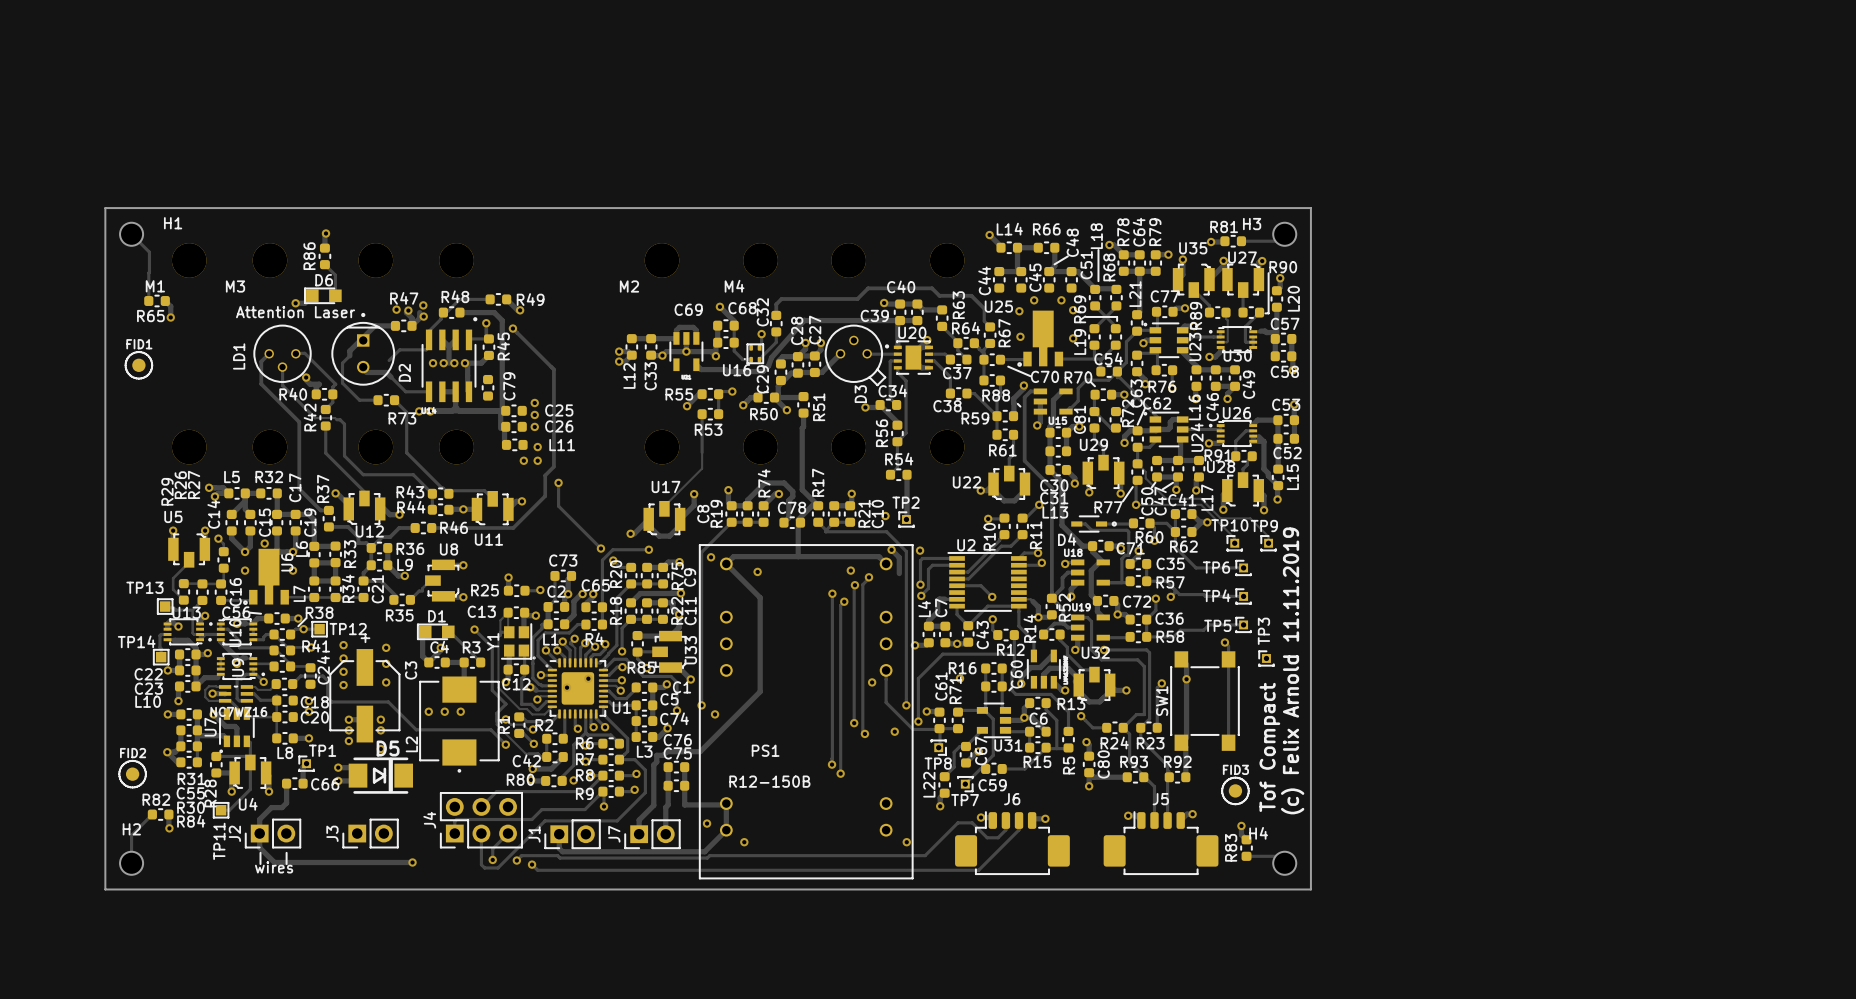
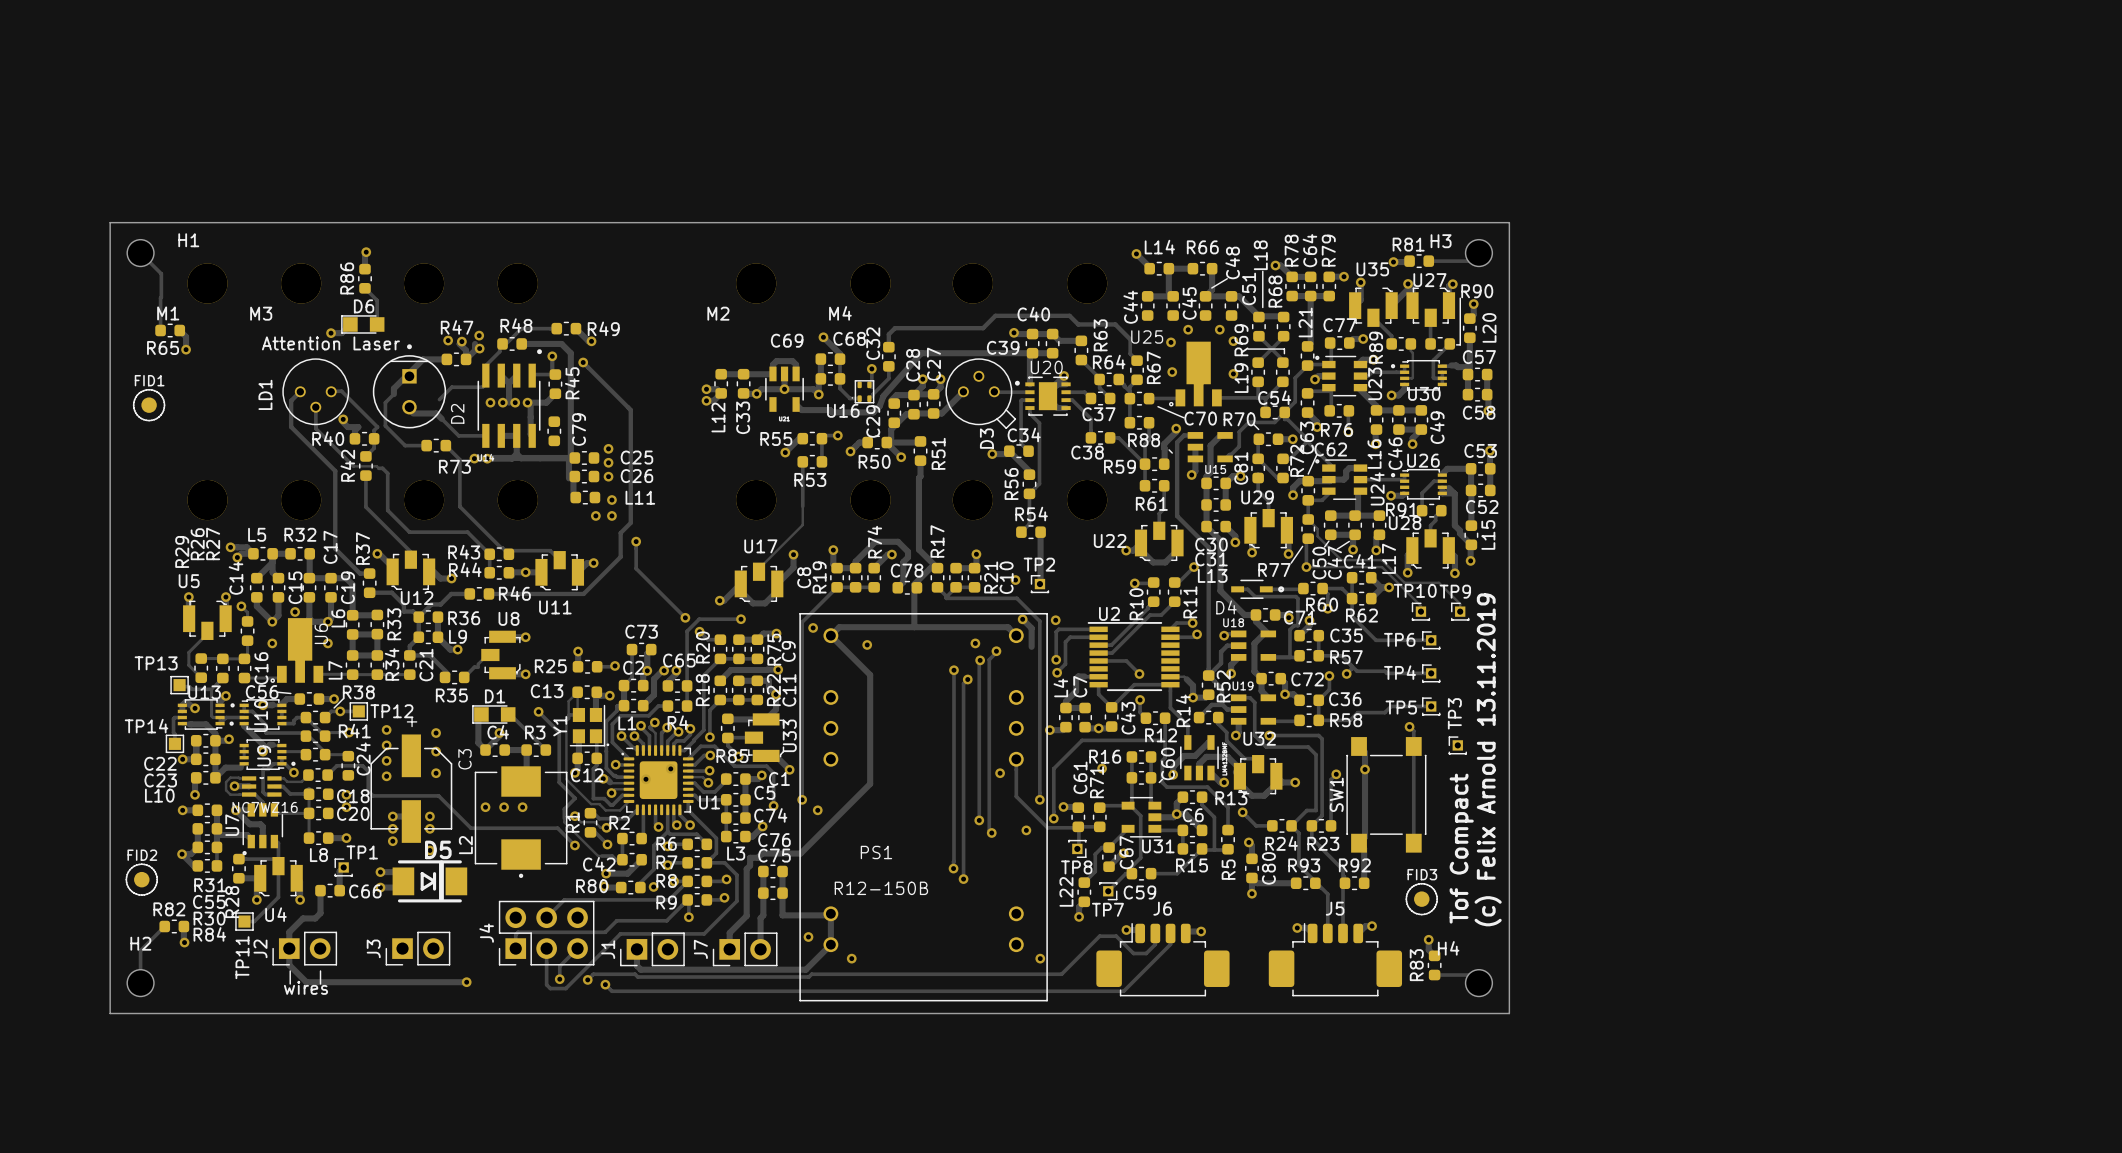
text: (c) Felix Arnold 11.11.2019 (1292, 670) -> (c) Felix Arnold 13.11.2019 (1488, 759)

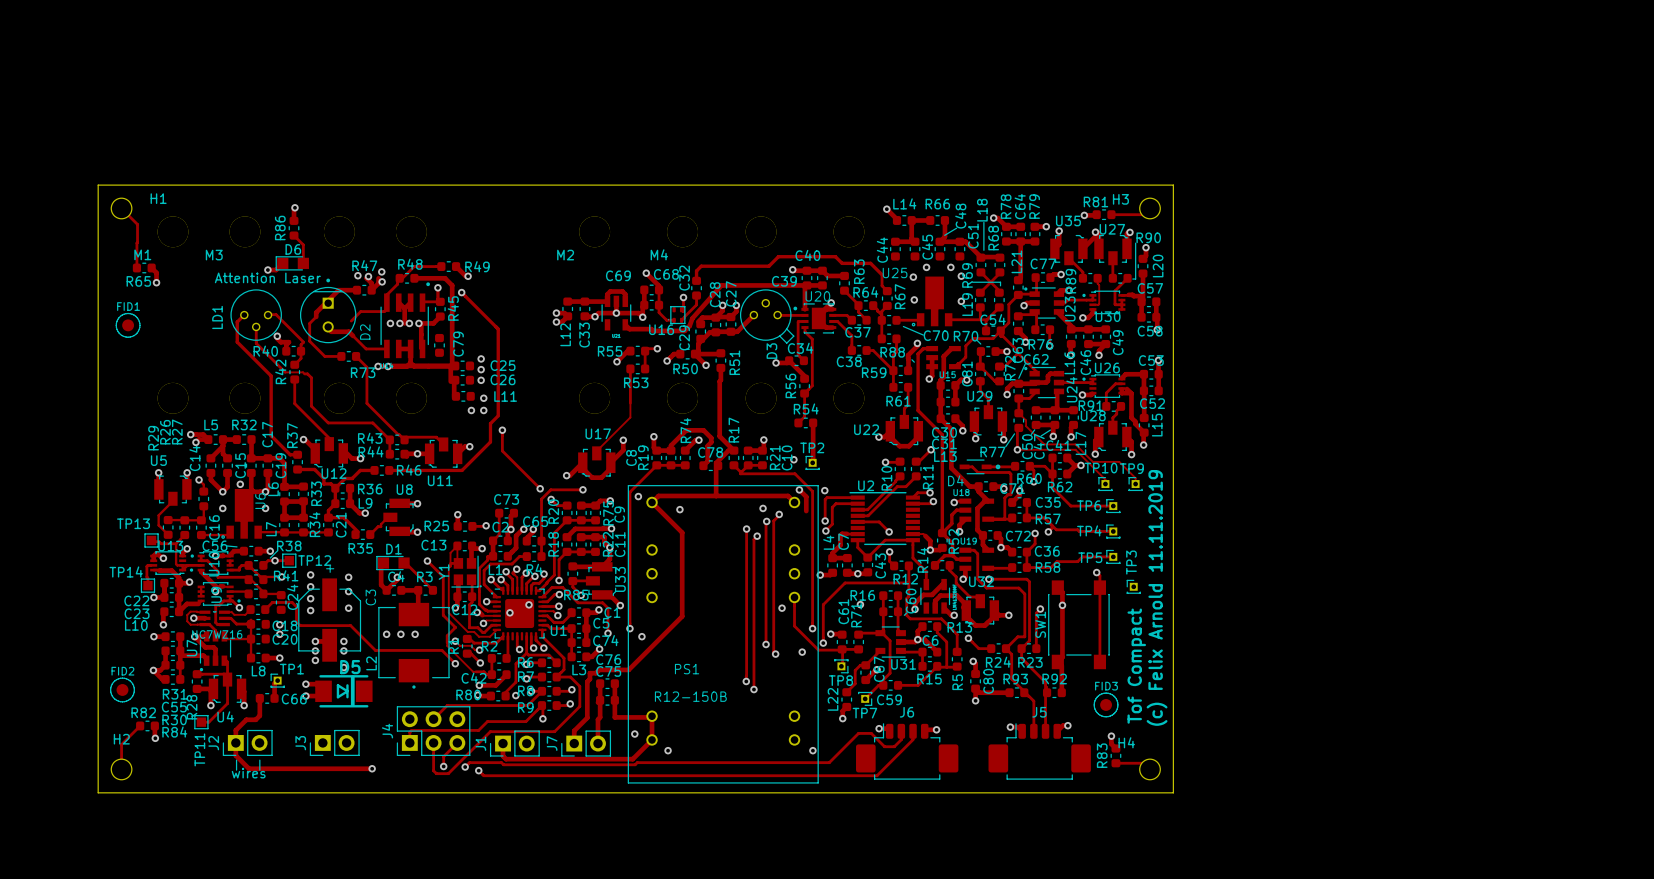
text: (c) Felix Arnold 13.11.2019 (1488, 759) -> (c) Felix Arnold 11.11.2019 (1157, 597)

